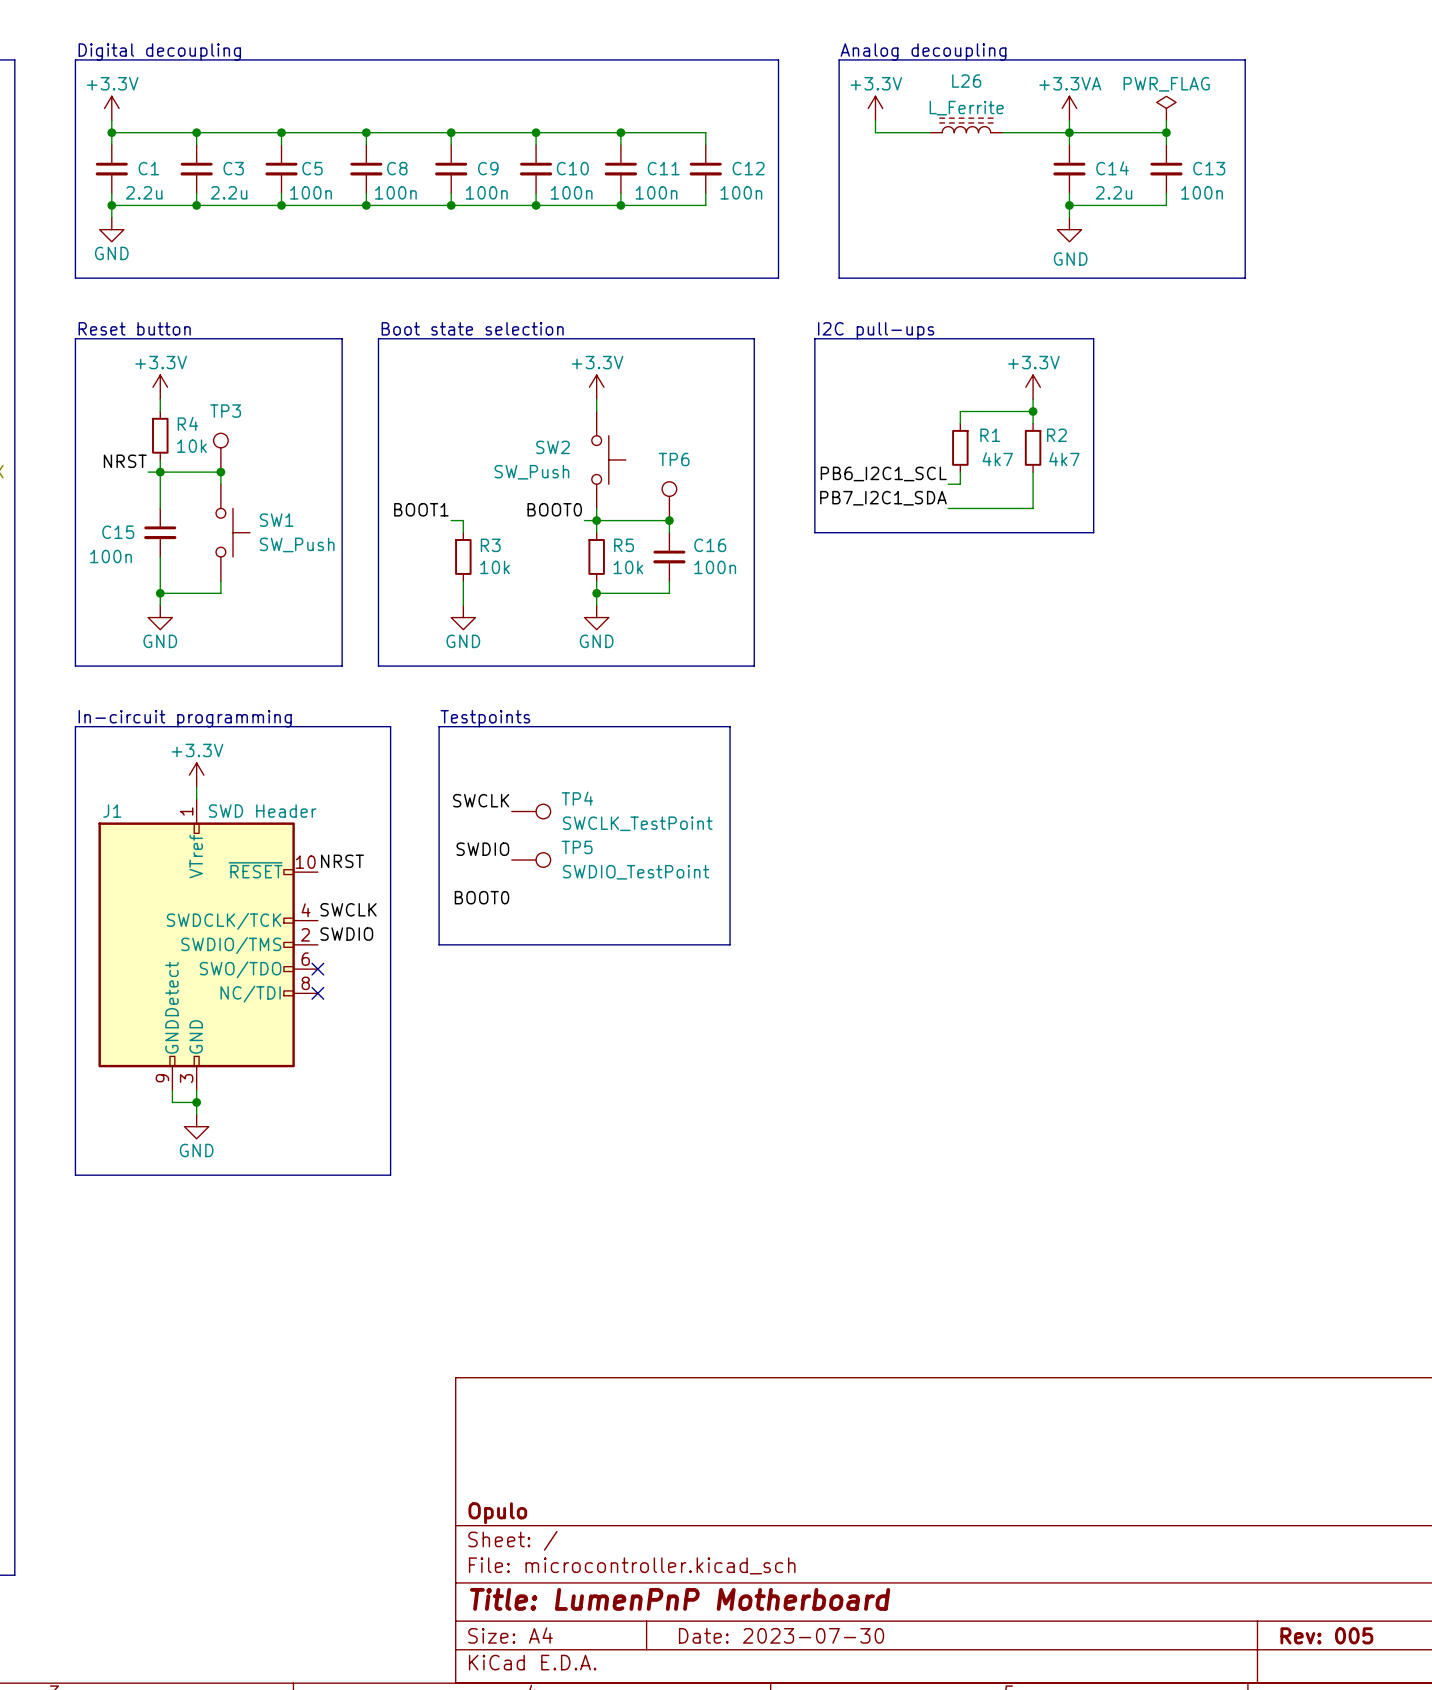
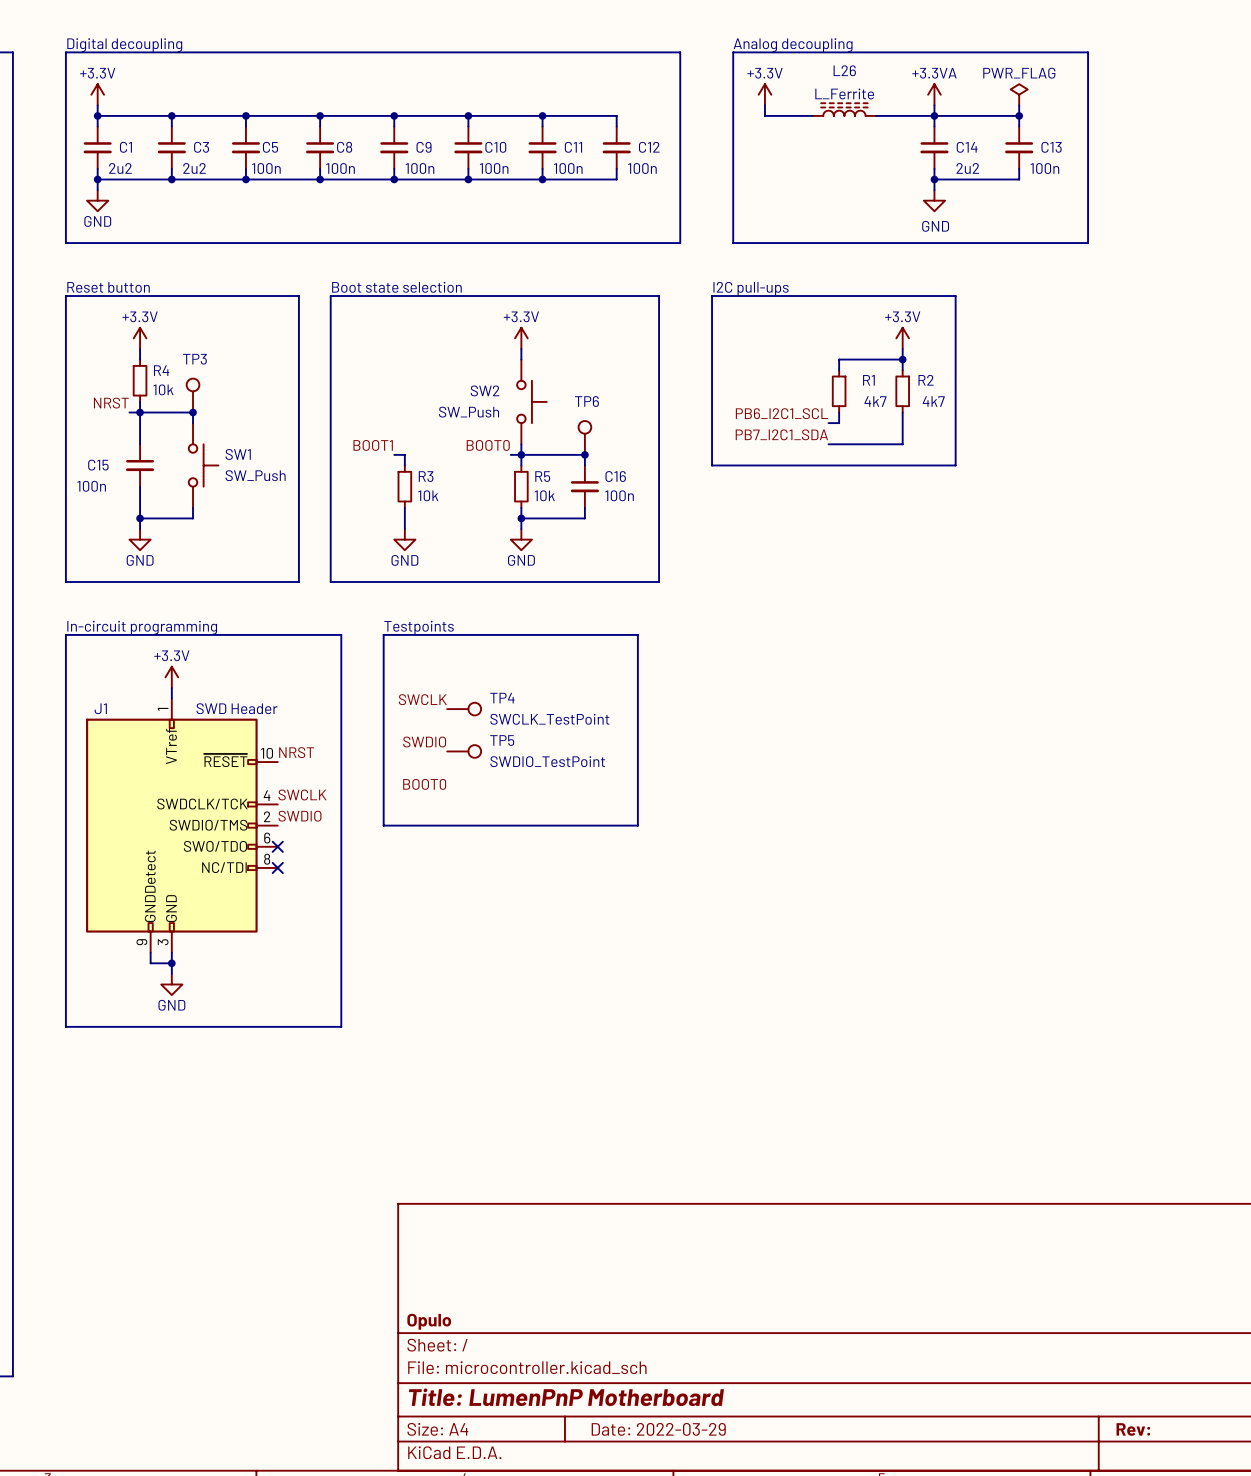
C1 value: 2.2u (144, 192) -> 2u2 (120, 168)
C3 value: 2.2u (229, 192) -> 2u2 (194, 168)
C14 value: 2.2u (1113, 192) -> 2u2 (967, 168)
title block: Date: 2023-07-30 (781, 1635) -> Date: 2022-03-29 (658, 1429)
title block: Rev: 005 (1326, 1635) -> Rev: (1133, 1429)

